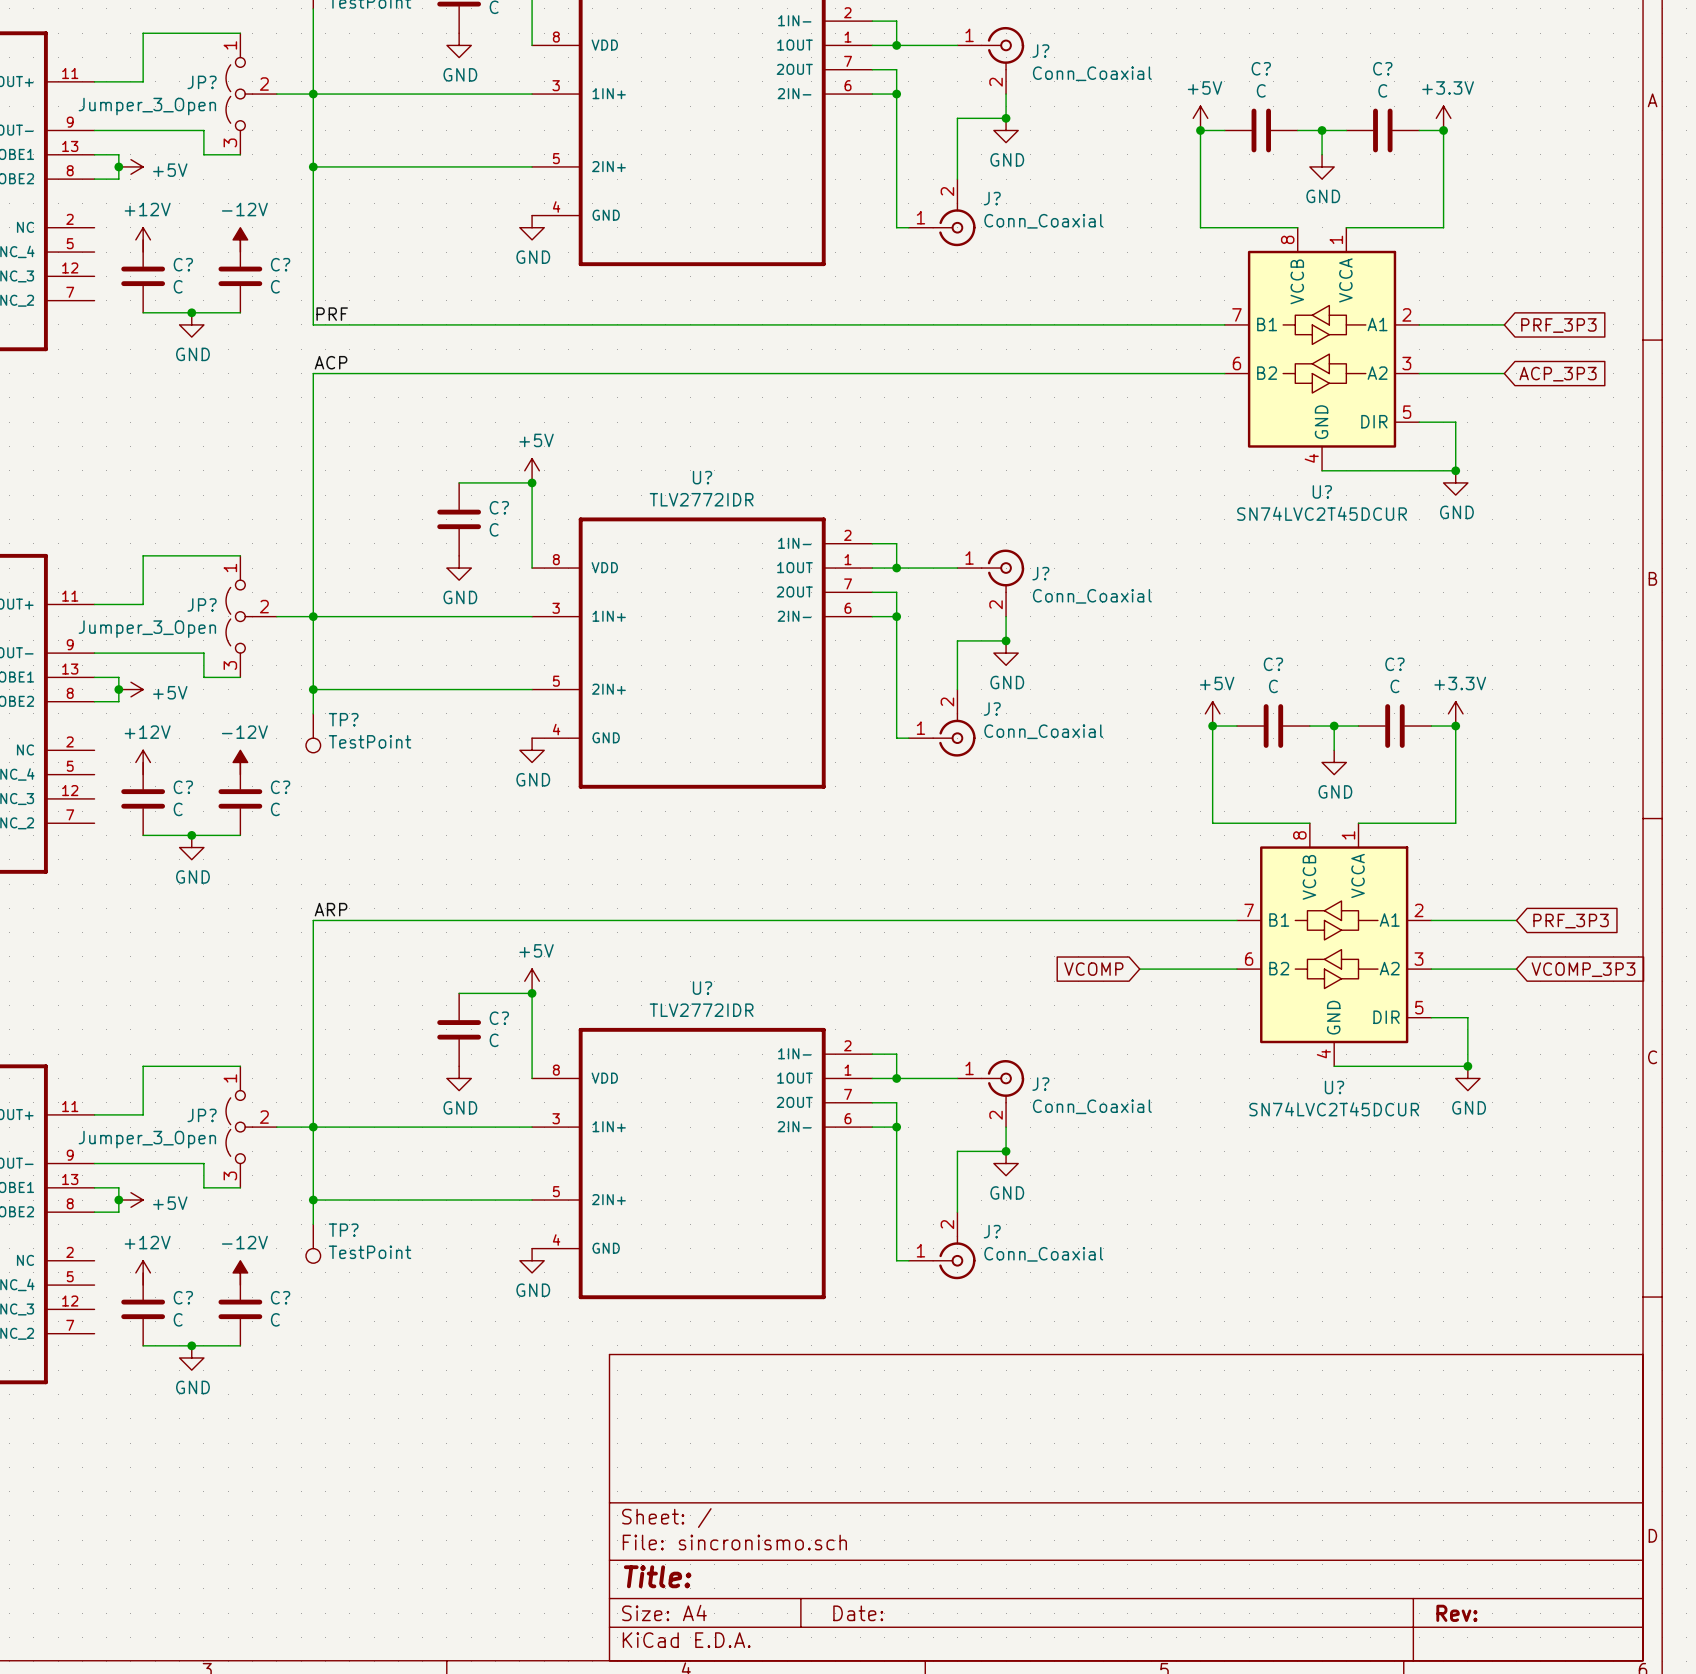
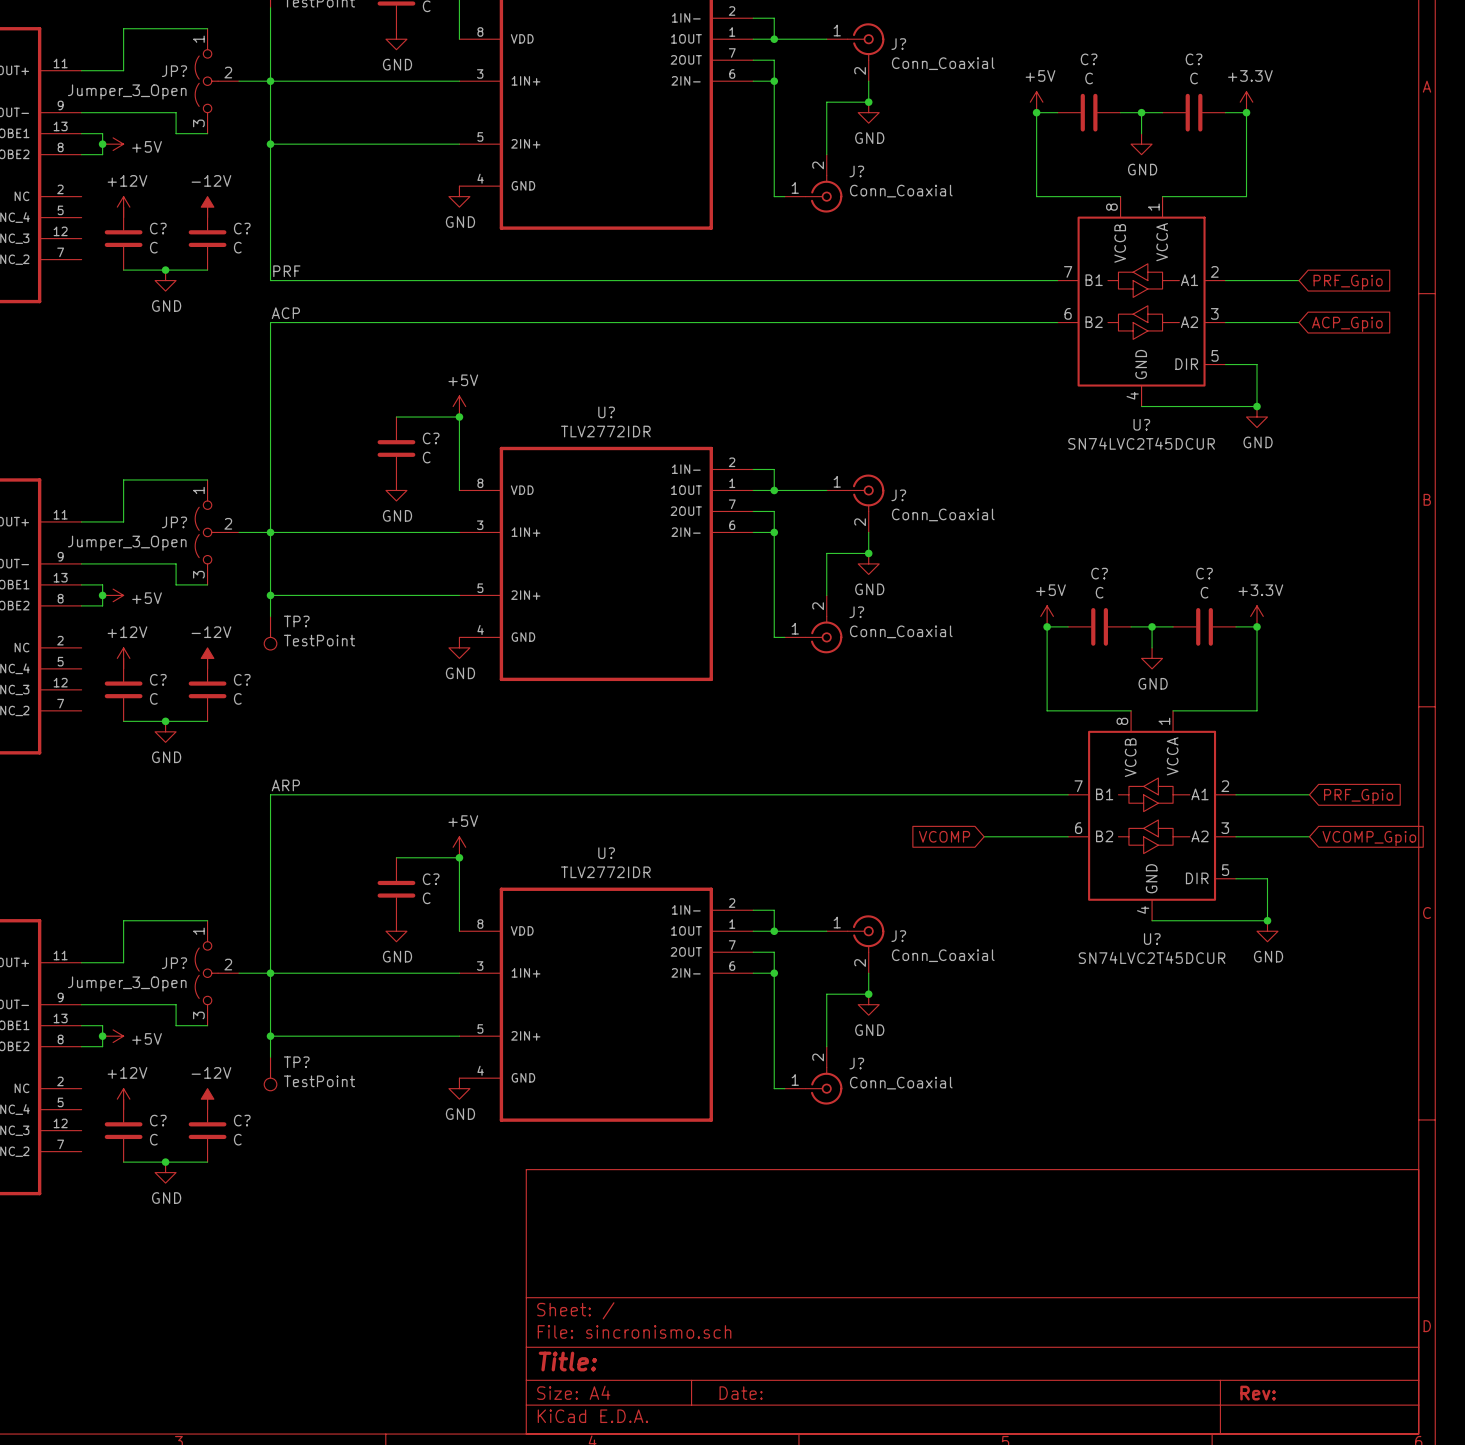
global label: PRF_3P3 (1558, 325) -> PRF_Gpio (1348, 282)
global label: ACP_3P3 (1558, 374) -> ACP_Gpio (1347, 324)
global label: PRF_3P3 (1571, 921) -> PRF_Gpio (1358, 796)
global label: VCOMP_3P3 (1583, 969) -> VCOMP_Gpio (1369, 838)

